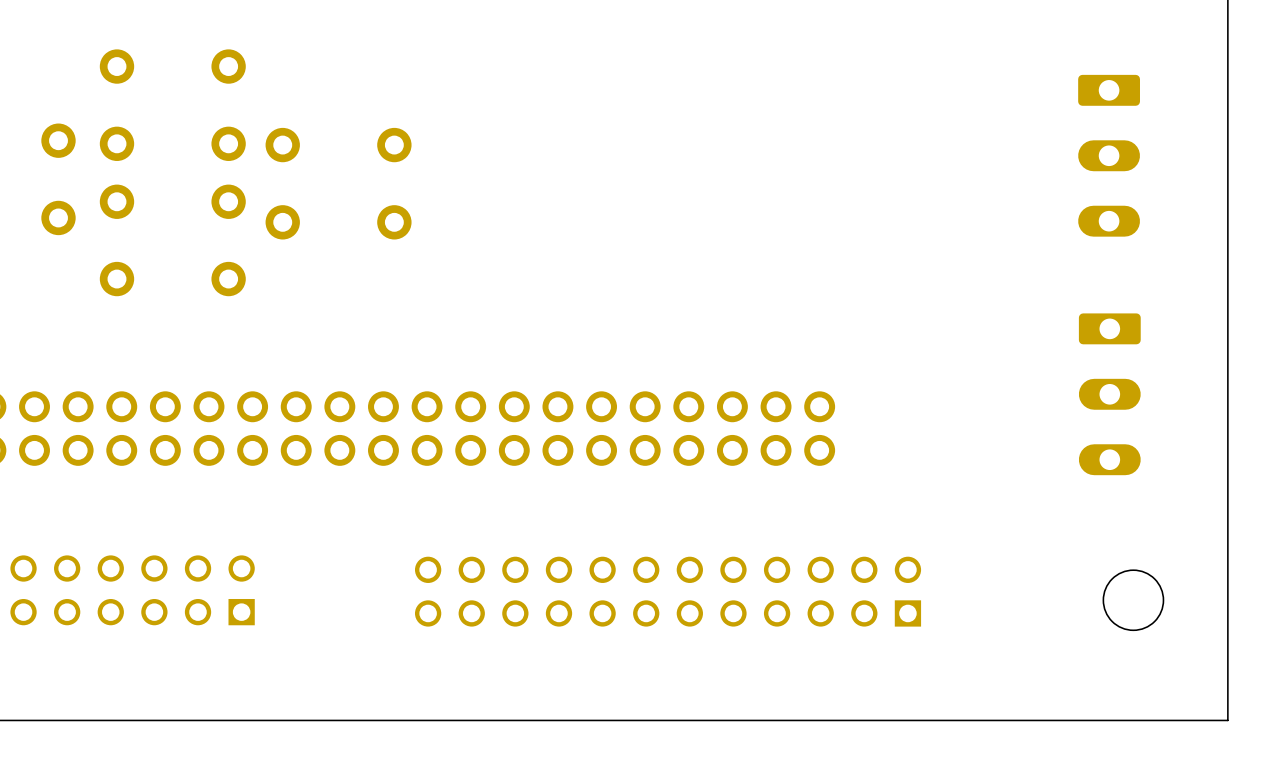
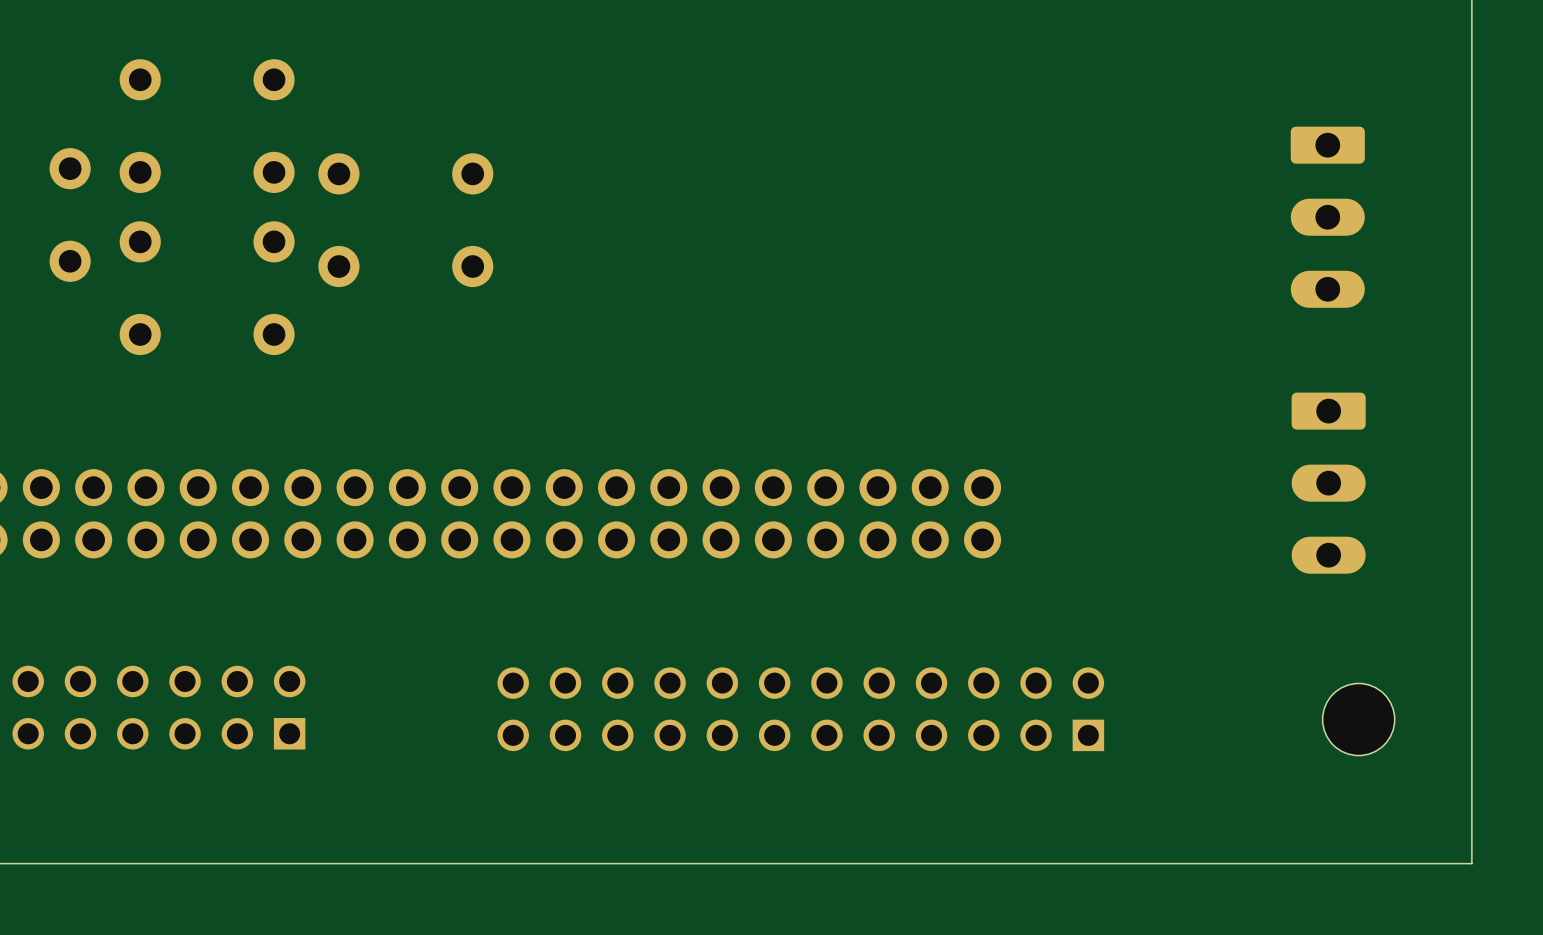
part: (1109, 155) -> none
part: none -> (1327, 217)
part footprint: [1078, 313, 1141, 476] -> [1291, 392, 1366, 574]

